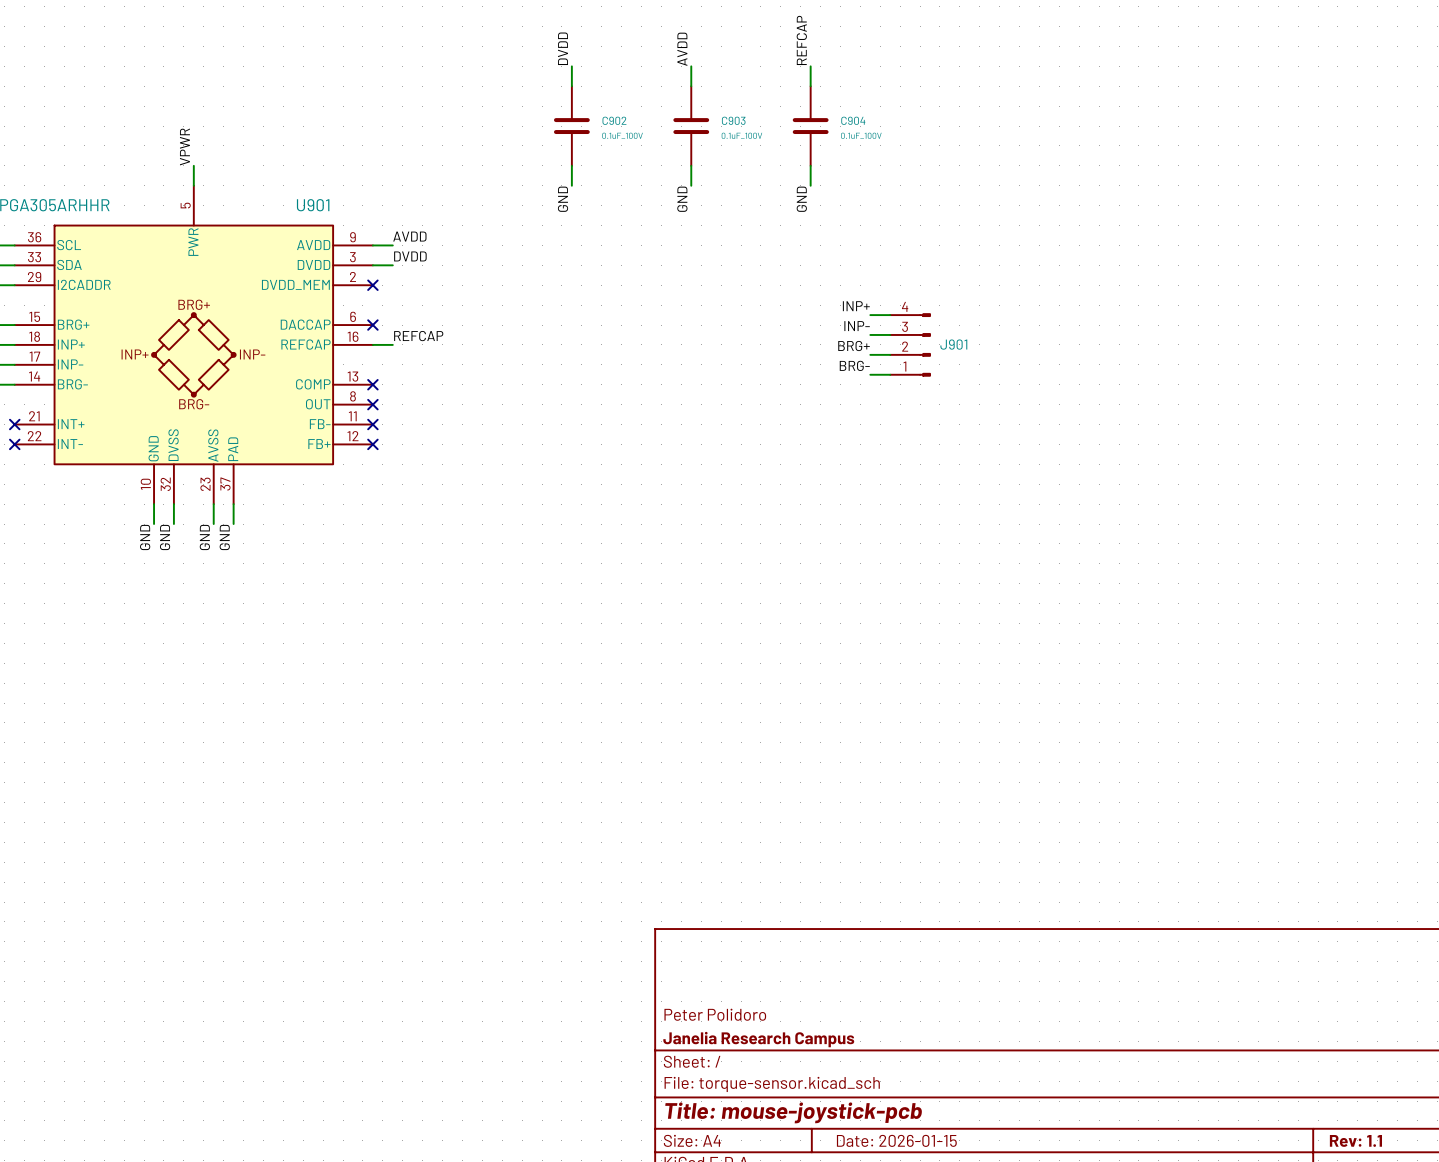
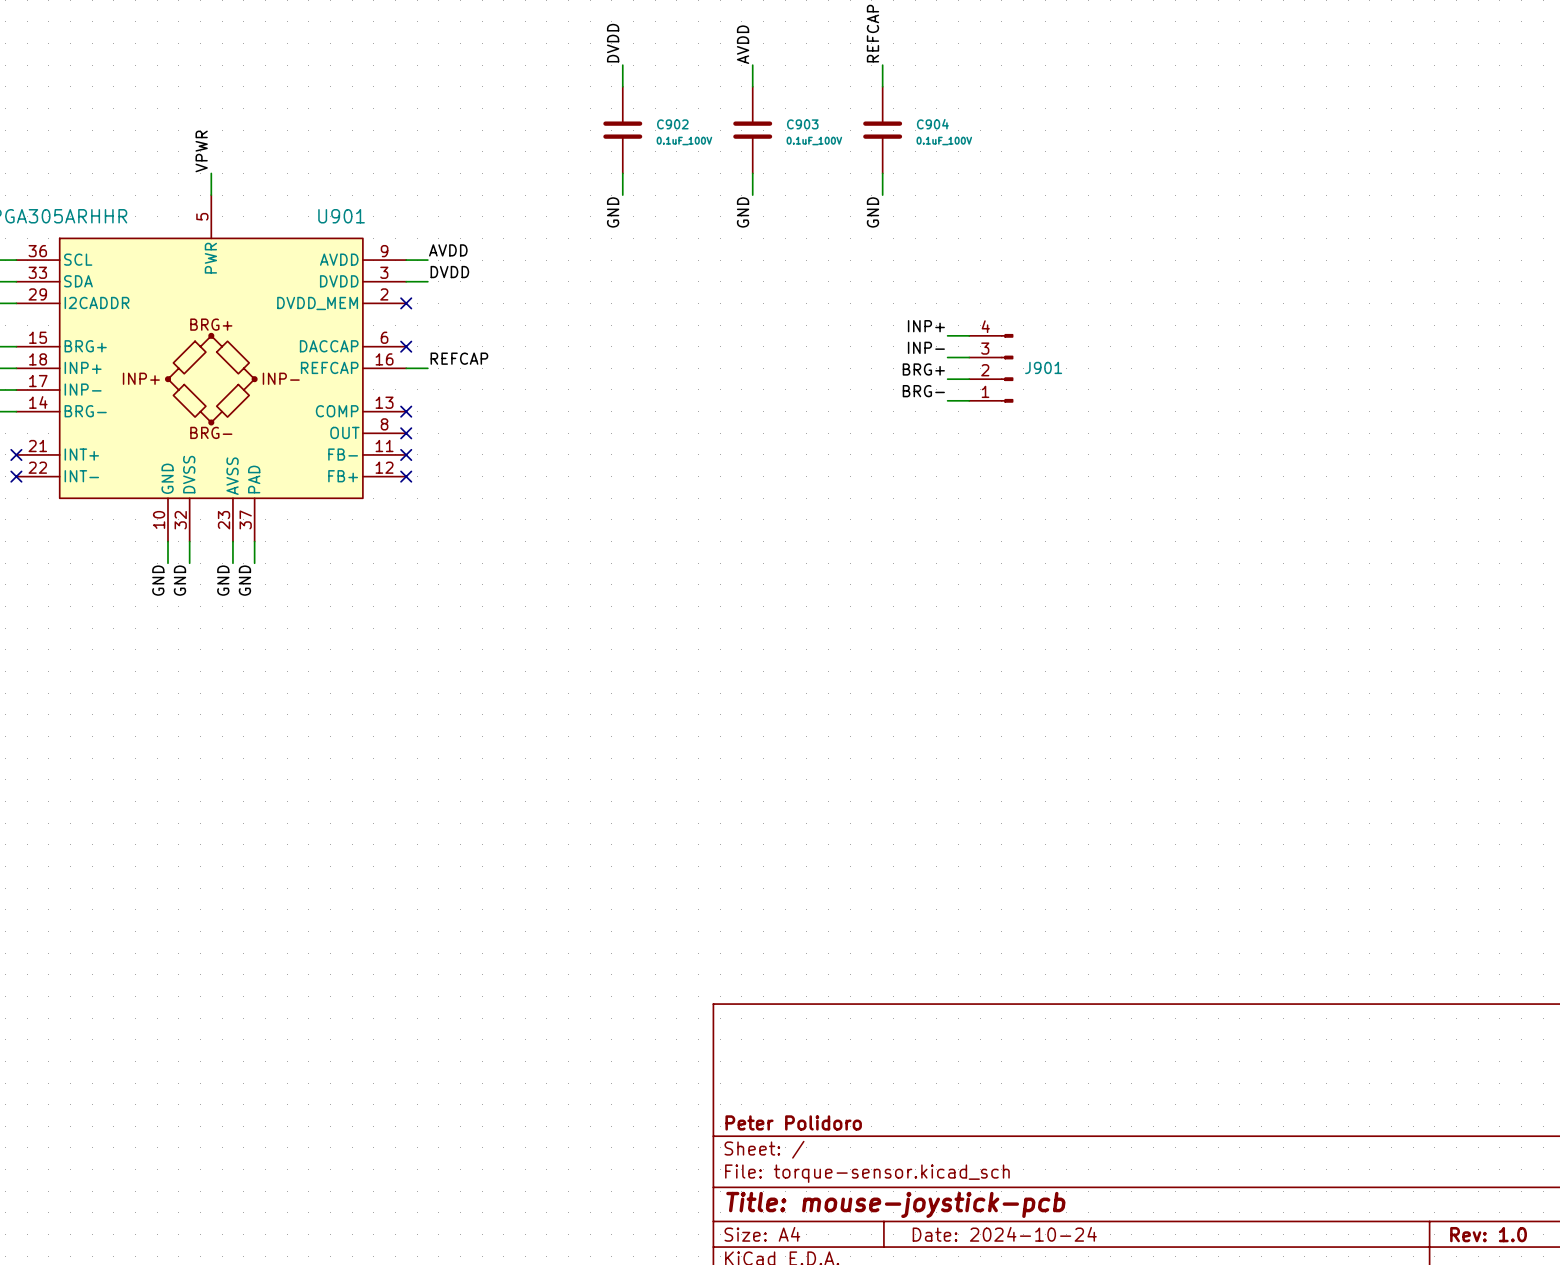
title block: Peter Polidoro (715, 1014) -> none
title block: Janelia Research Campus (758, 1039) -> Peter Polidoro (793, 1122)
title block: Date: 2026-01-15 (896, 1140) -> Date: 2024-10-24 (1004, 1234)
title block: Rev: 1.1 (1355, 1140) -> Rev: 1.0 (1488, 1234)

